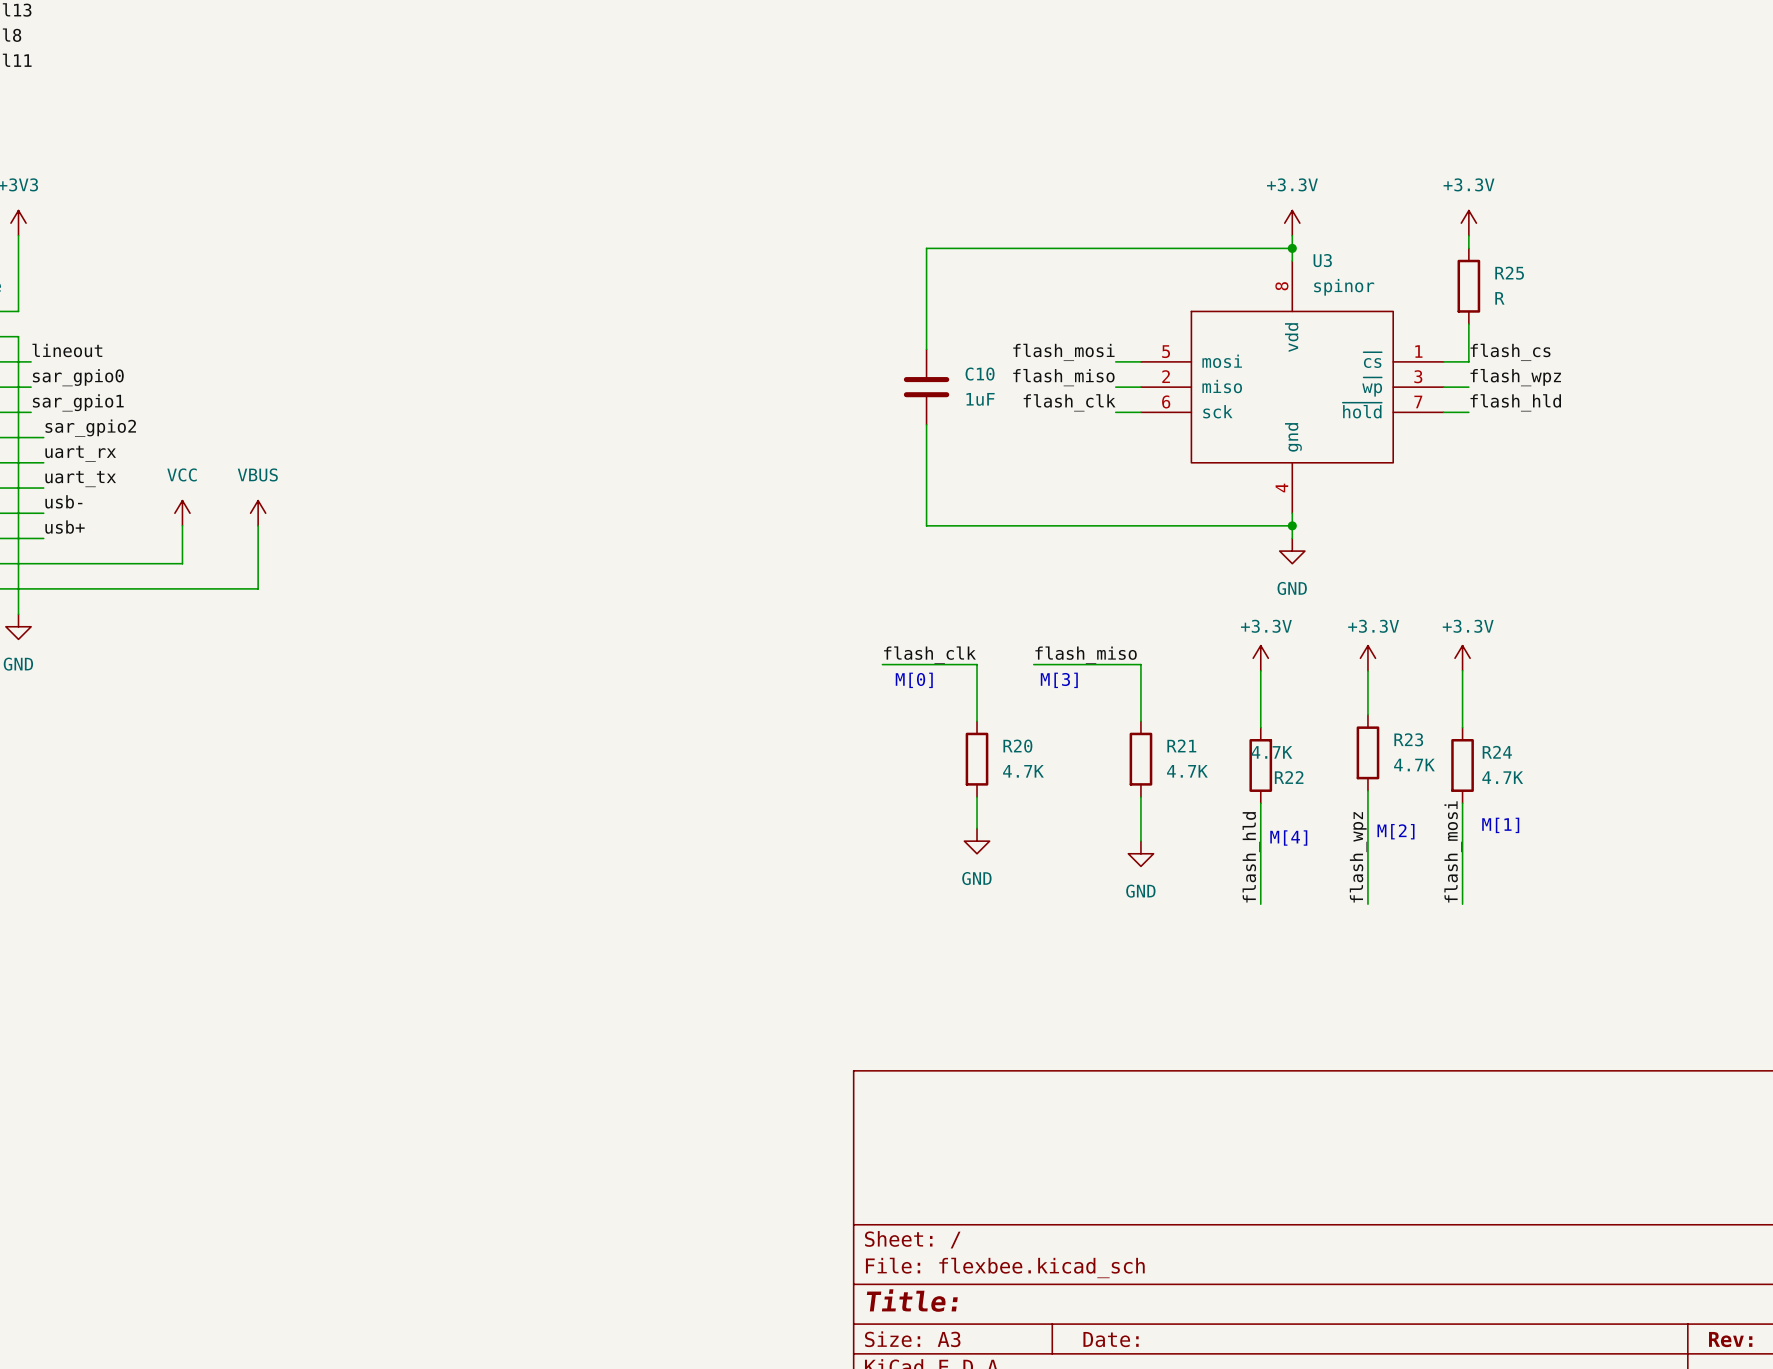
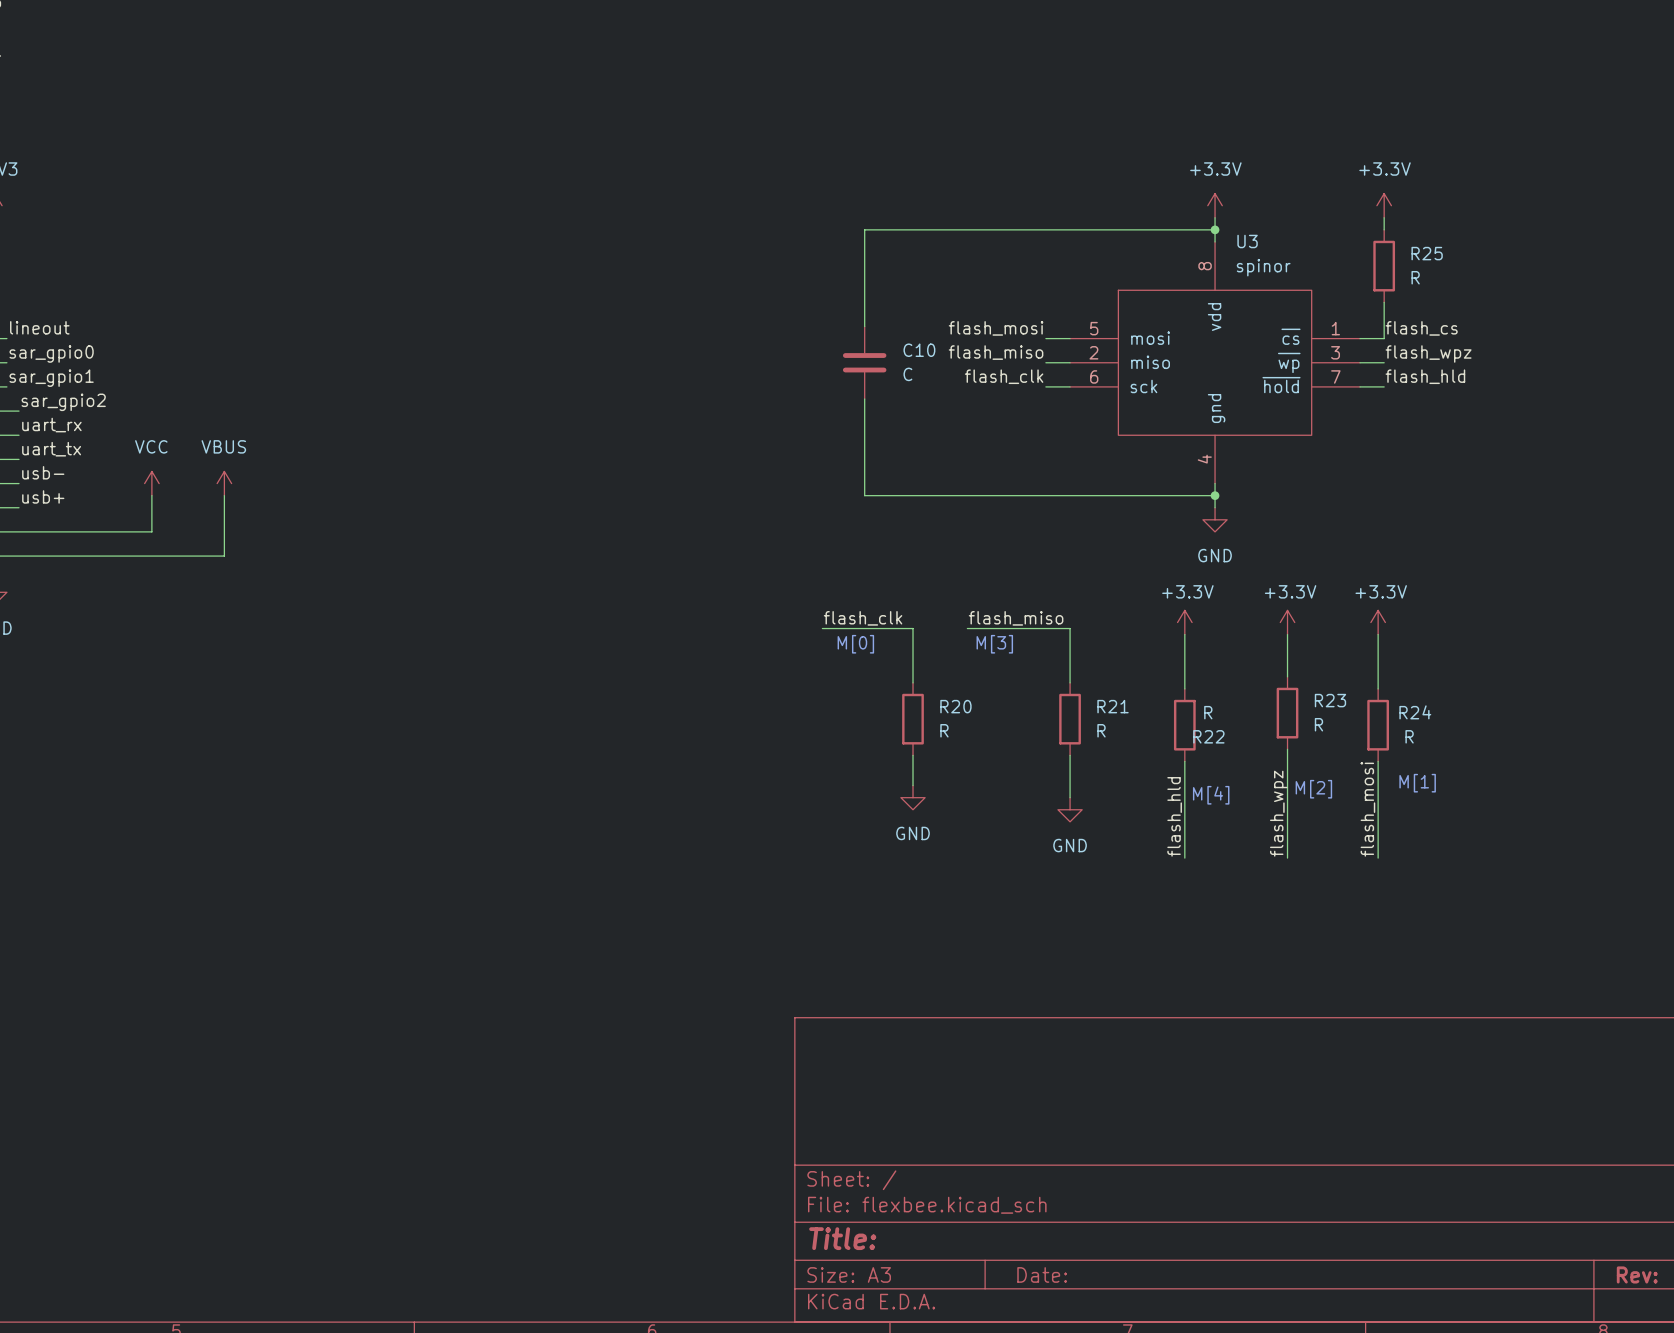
C10 value: 1uF (980, 399) -> C (907, 374)
R22 value: 4.7K (1271, 752) -> R (1208, 712)
R23 value: 4.7K (1414, 765) -> R (1318, 724)
R20 value: 4.7K (1023, 771) -> R (944, 730)
R21 value: 4.7K (1187, 771) -> R (1101, 730)
R24 value: 4.7K (1502, 777) -> R (1409, 736)

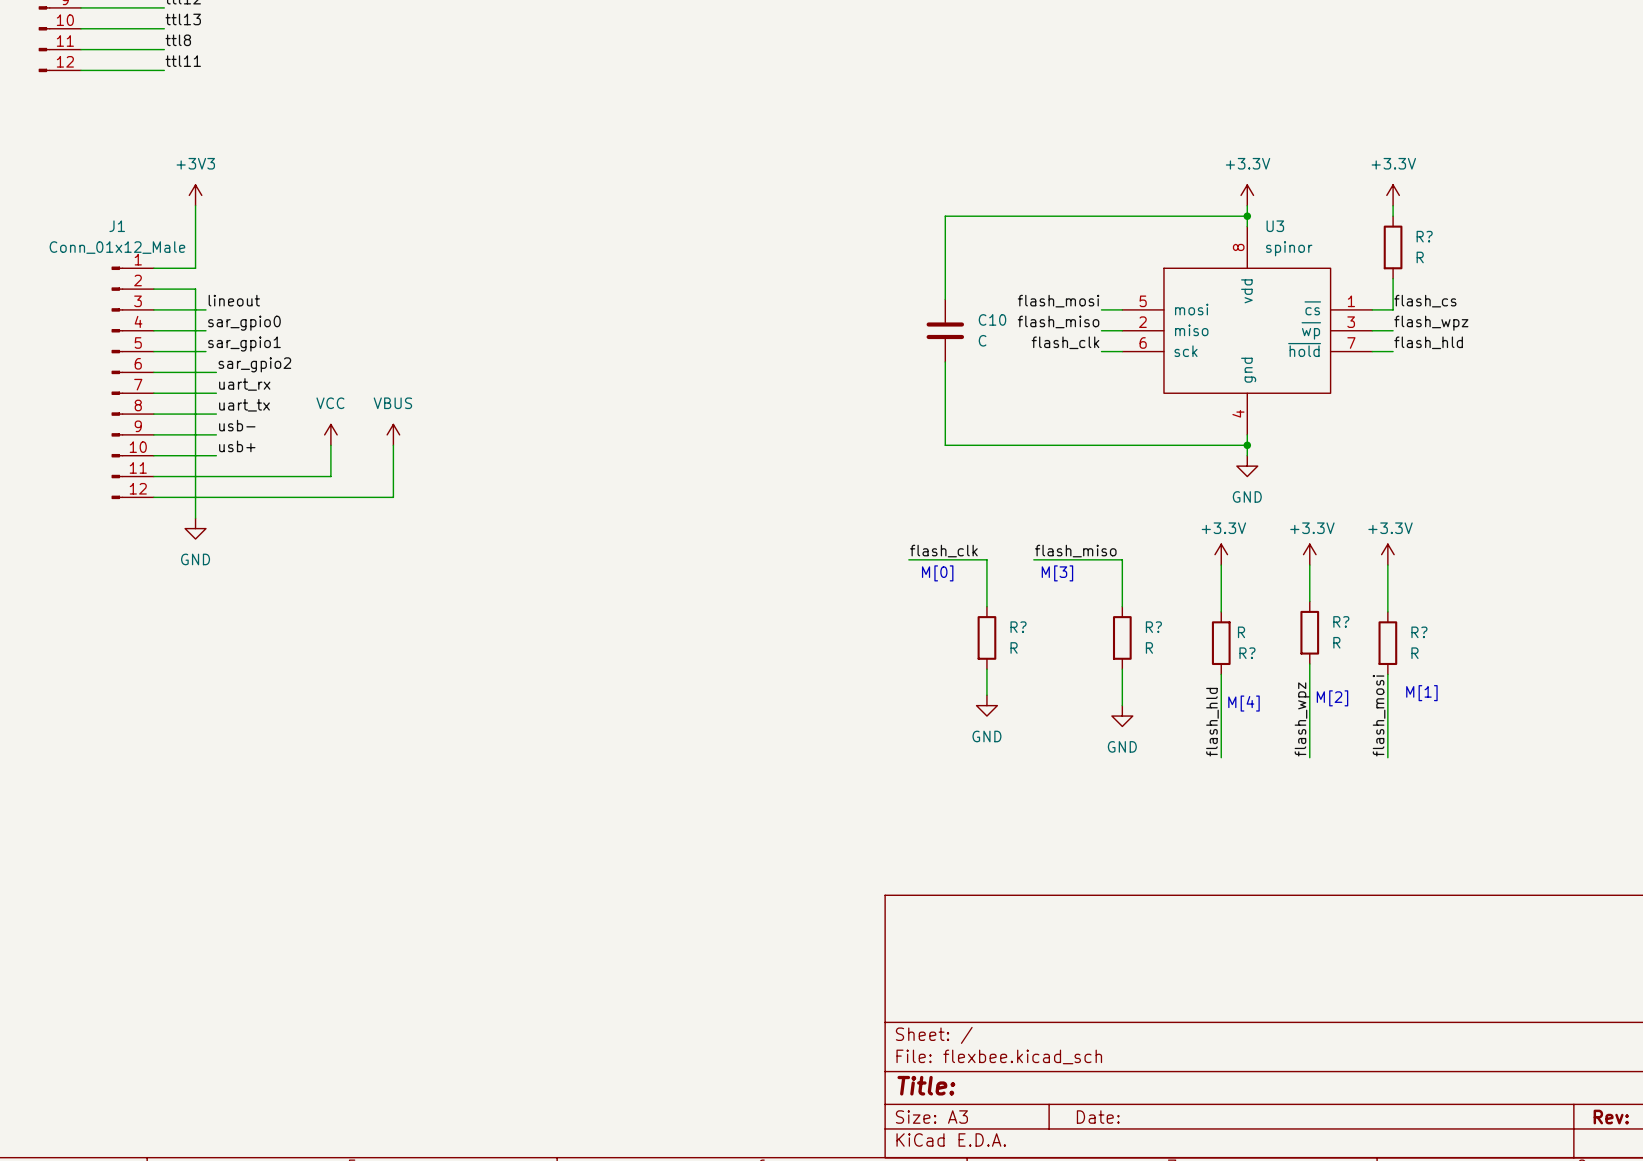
R25 name: R25 (1427, 253) -> R? (1424, 236)
R23 name: R23 (1330, 700) -> R? (1341, 621)
R20 name: R20 (955, 706) -> R? (1018, 627)
R21 name: R21 (1113, 706) -> R? (1153, 627)
R24 name: R24 (1415, 712) -> R? (1419, 632)
R22 name: R22 (1208, 736) -> R? (1247, 653)

